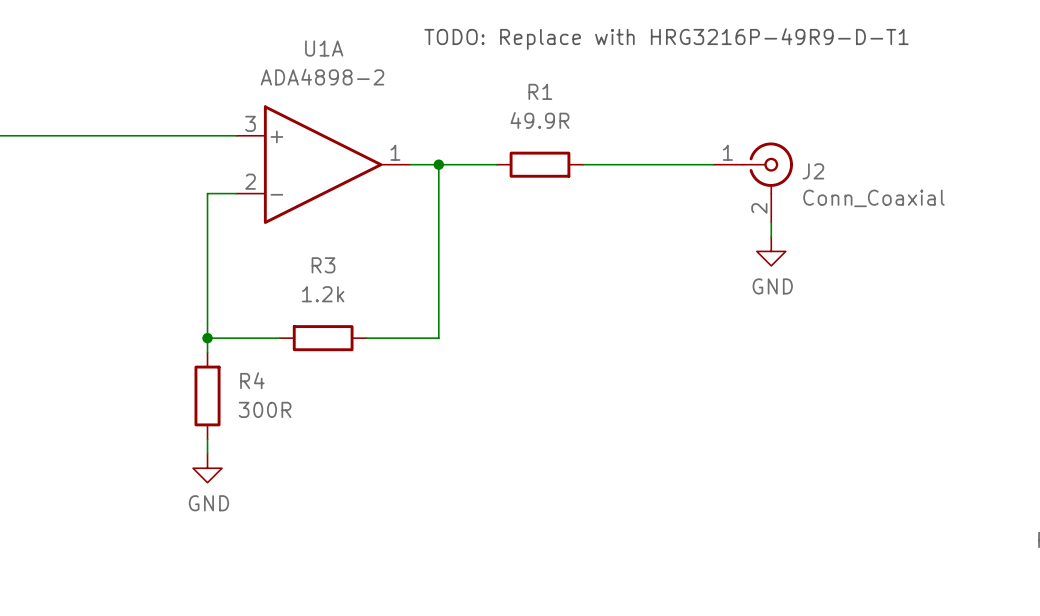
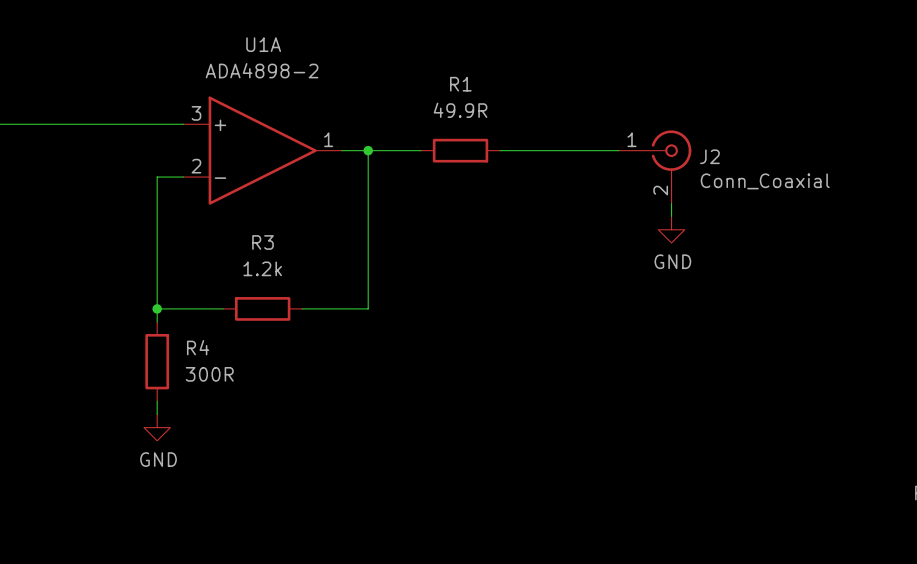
text: TODO: Replace with HRG3216P-49R9-D-T1 (666, 39) -> none

